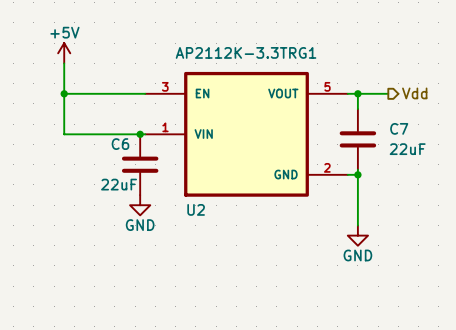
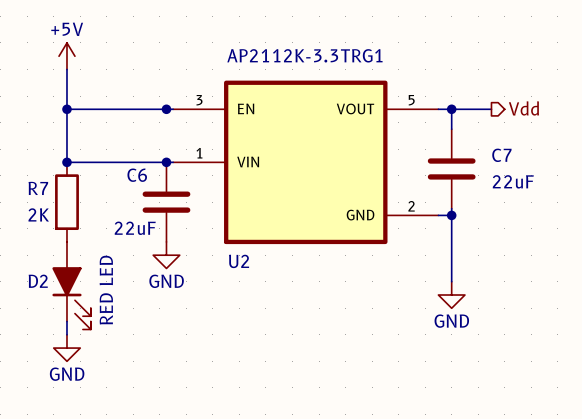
junction: none -> (166, 109)
junction: none -> (66, 162)
R7: none -> 2K (66, 202)
D2: none -> RED LED (71, 285)
wire: none -> (66, 321) (66, 334)
power symbol: none -> GND (66, 348)

